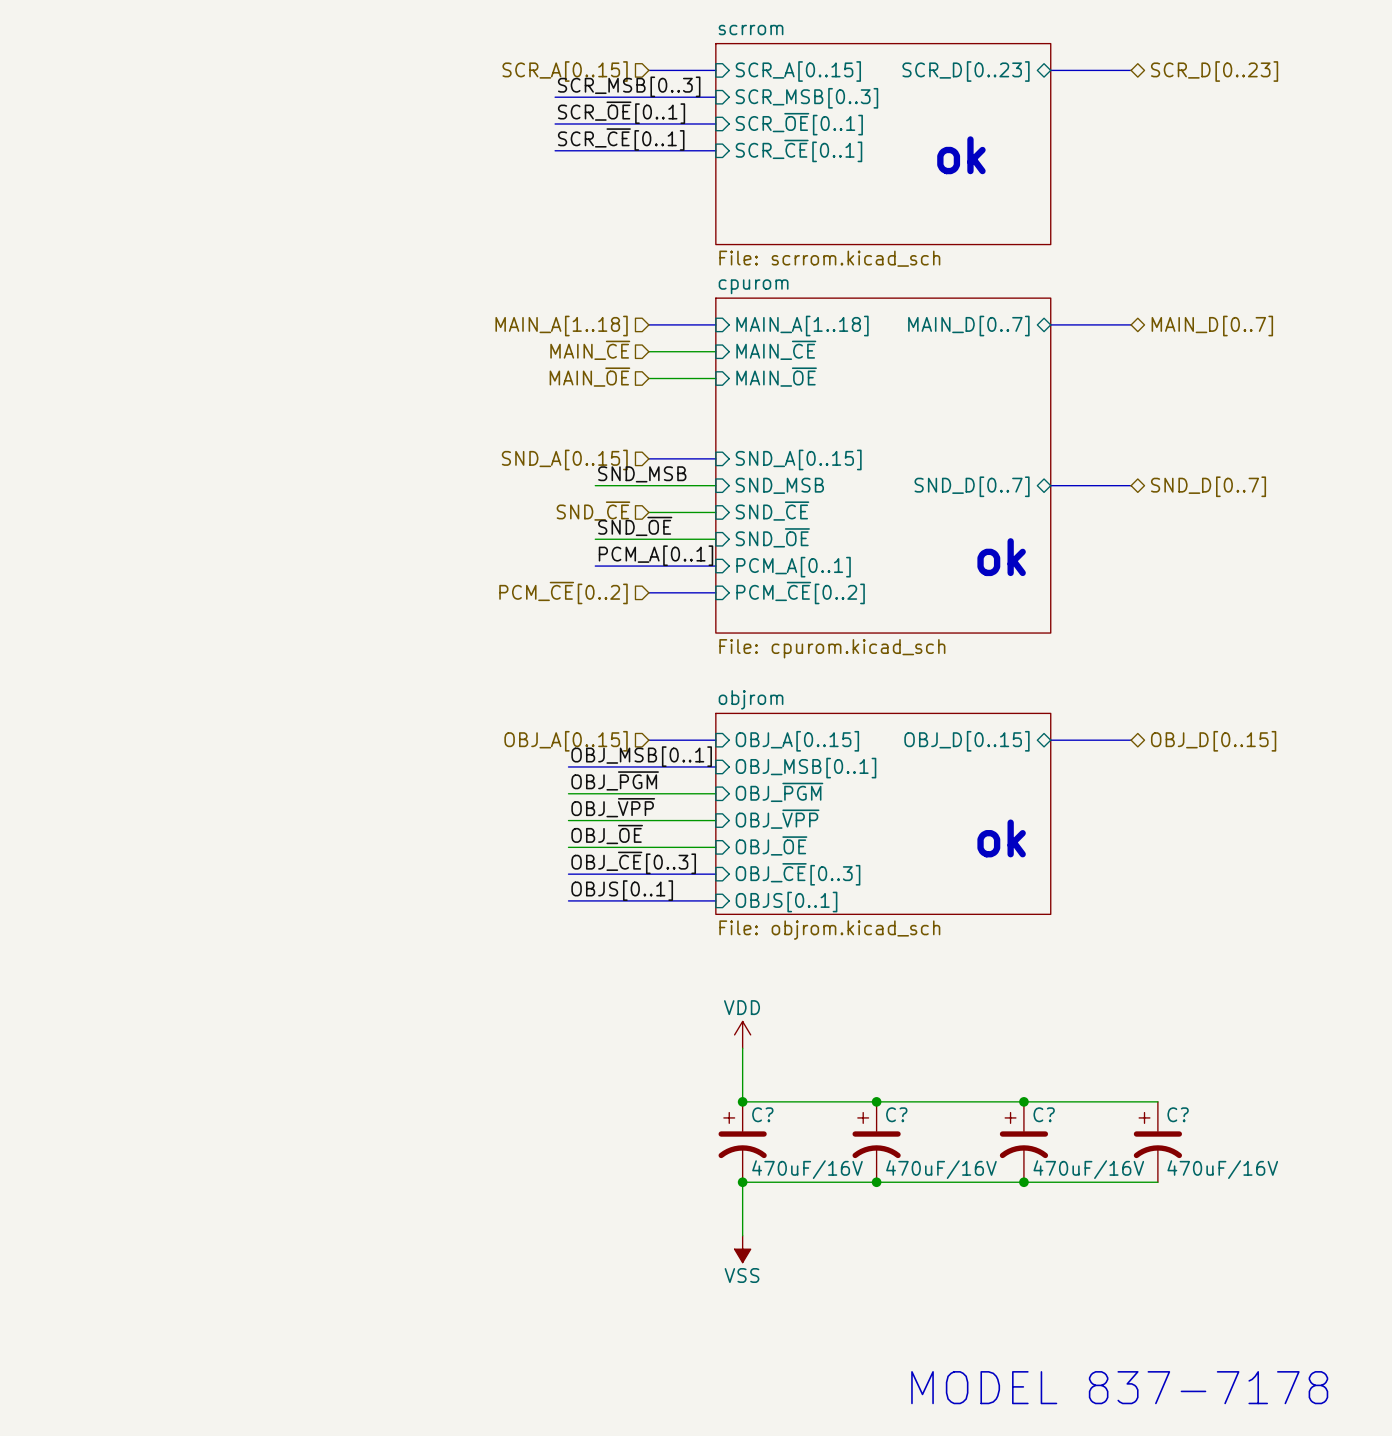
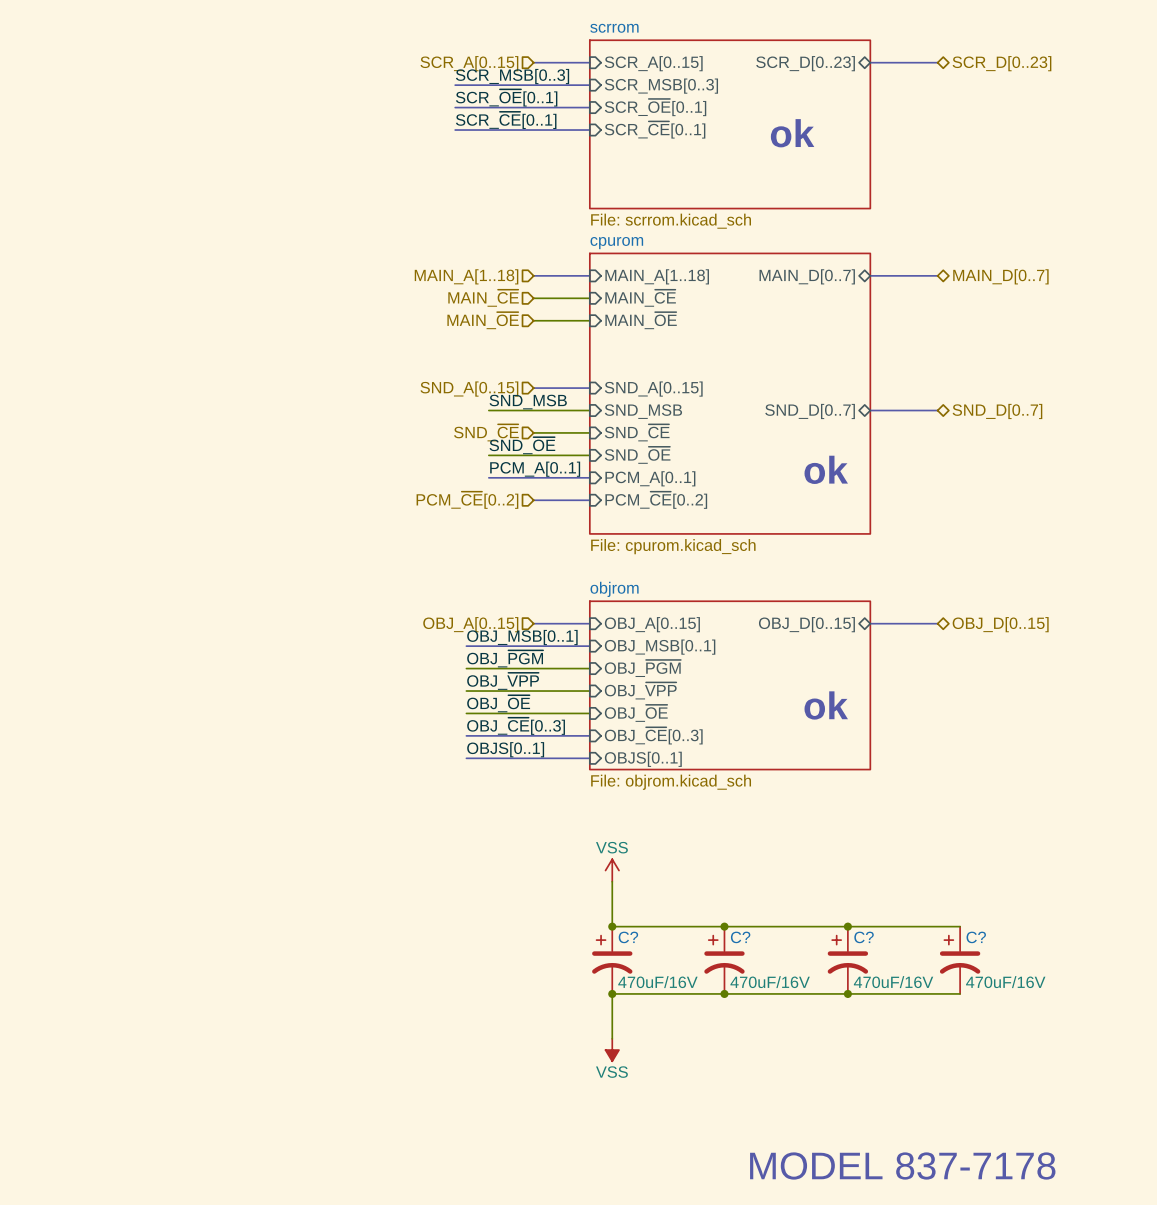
power symbol: VDD (742, 1034) -> VSS (612, 870)

